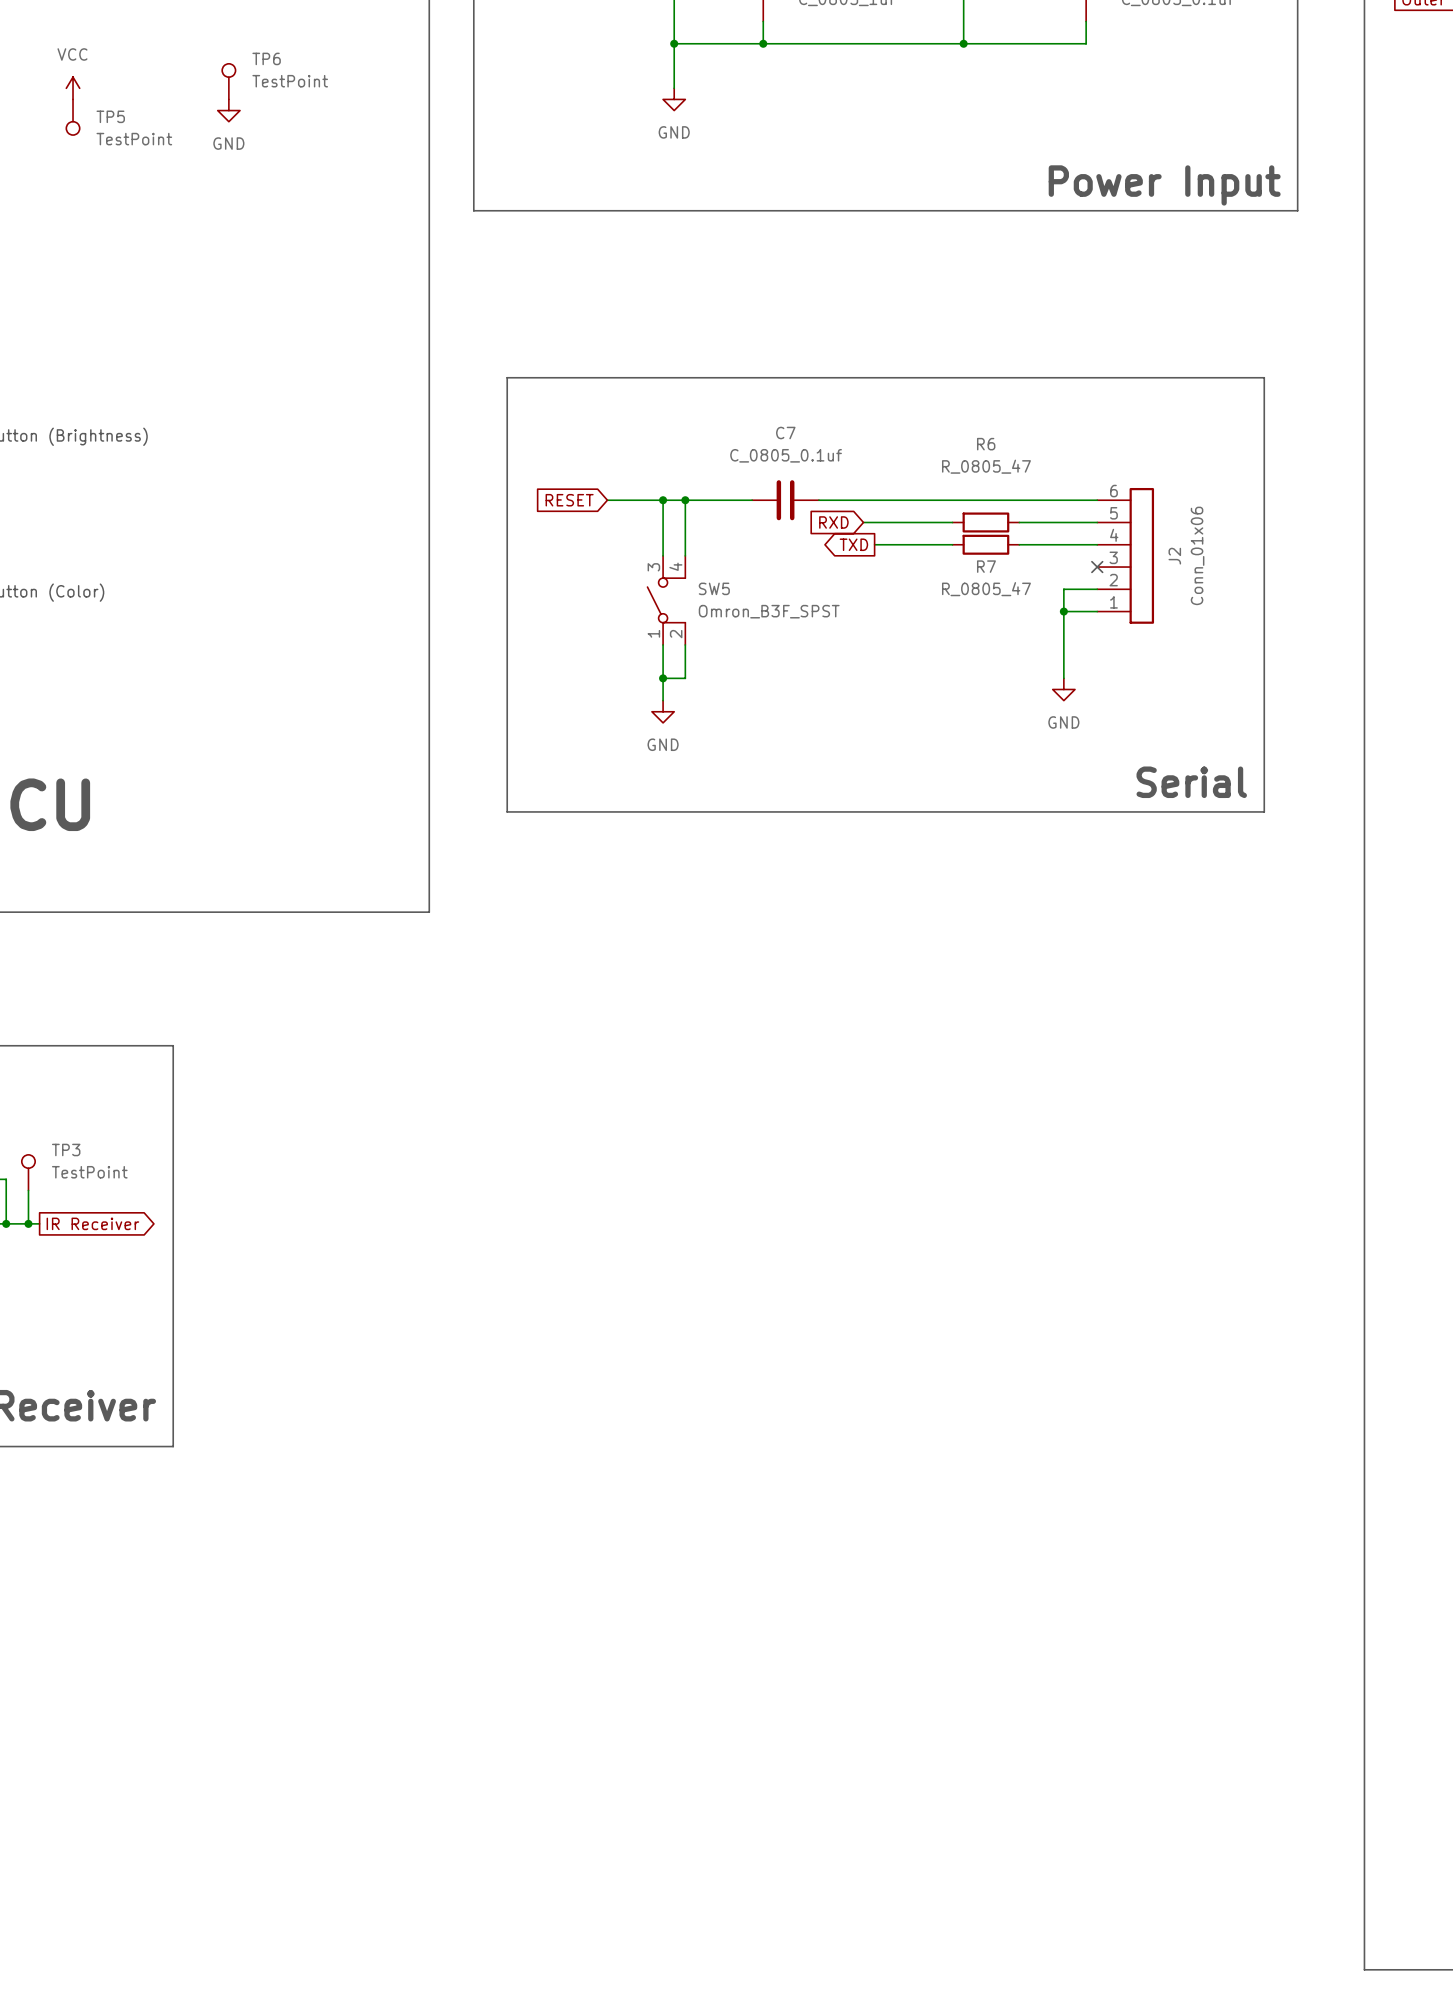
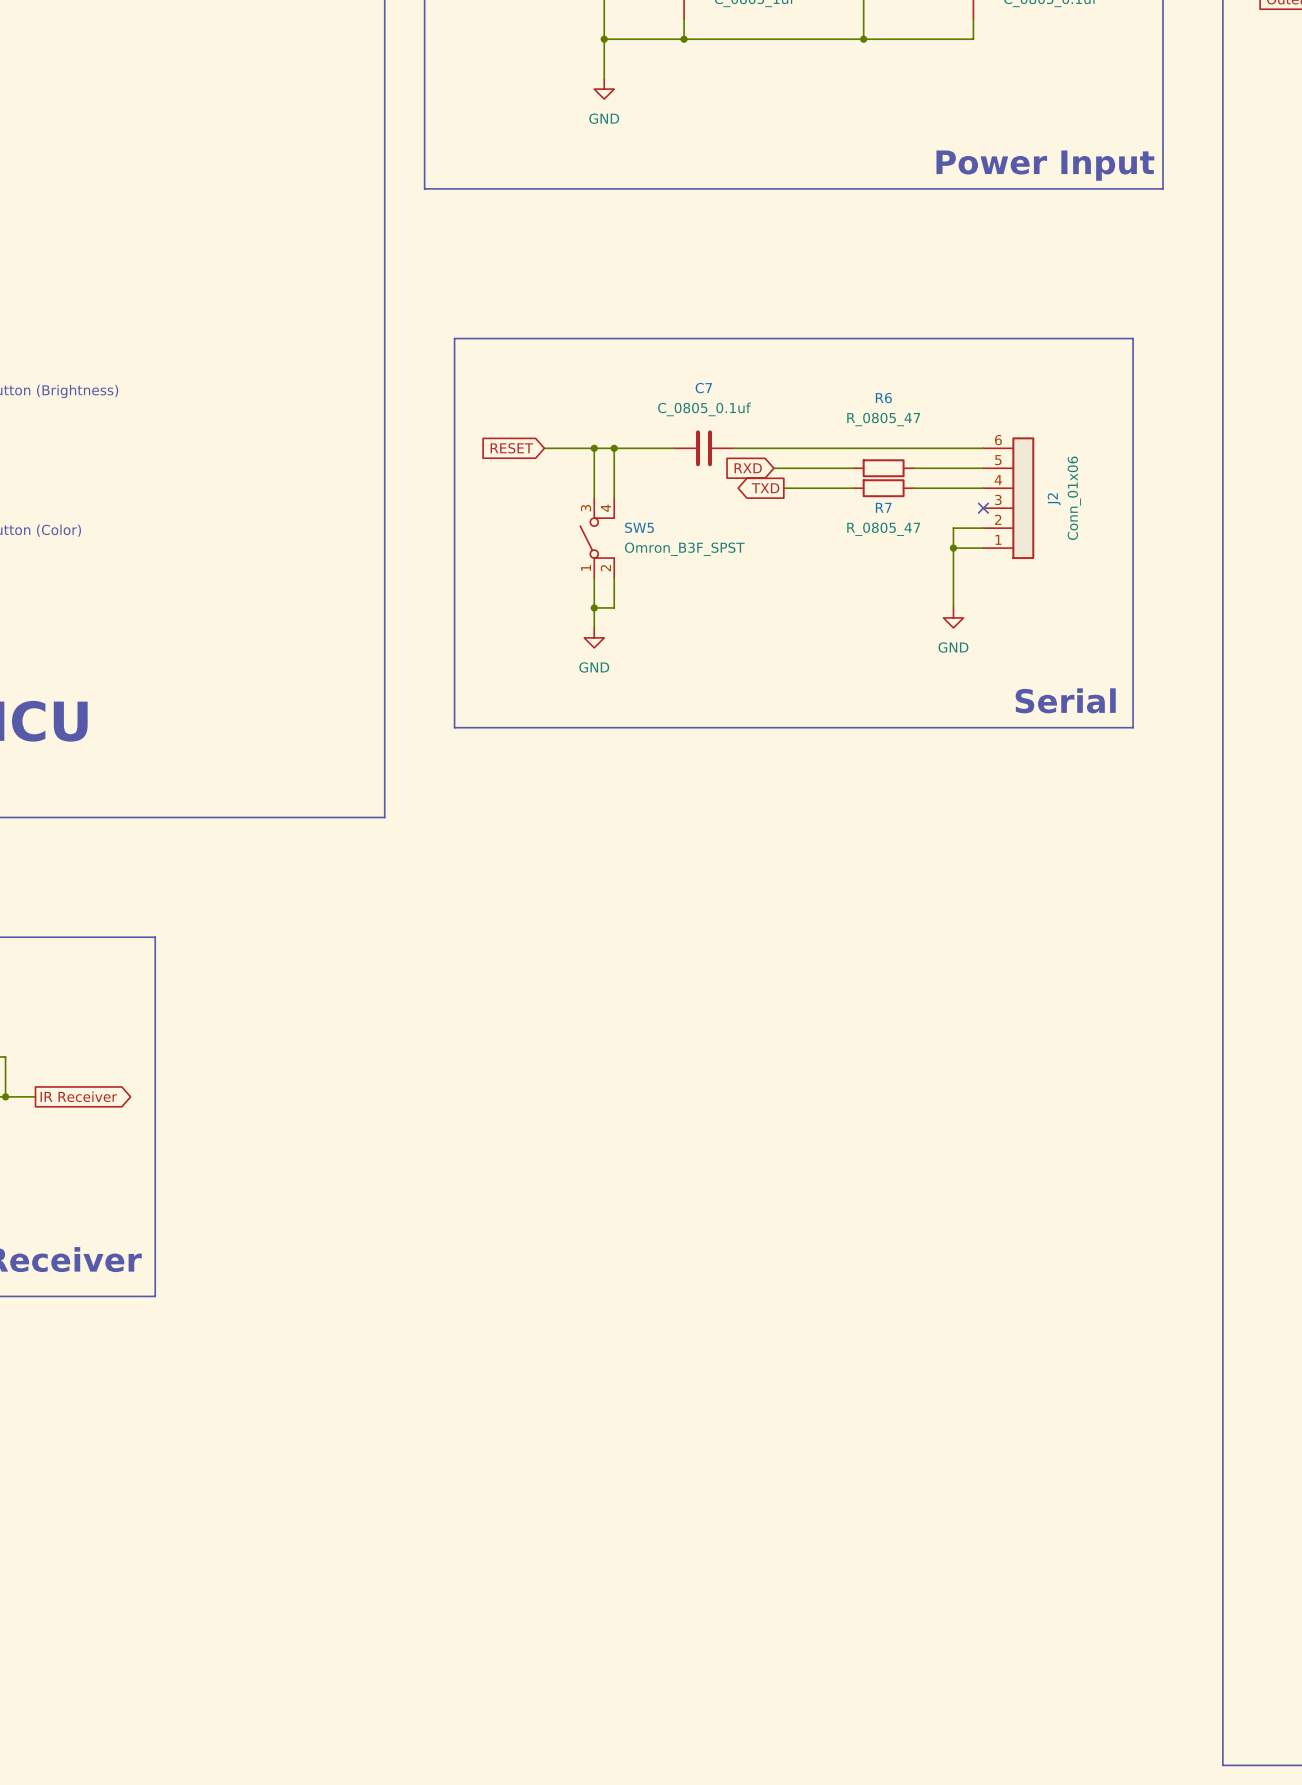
TP6: TestPoint (228, 81) -> none
power symbol: VCC (73, 88) -> none
power symbol: GND (228, 110) -> none
TP5: TestPoint (73, 117) -> none
TP3: TestPoint (28, 1172) -> none
wire: (28, 1190) (28, 1223) -> none
junction: (28, 1223) -> none

